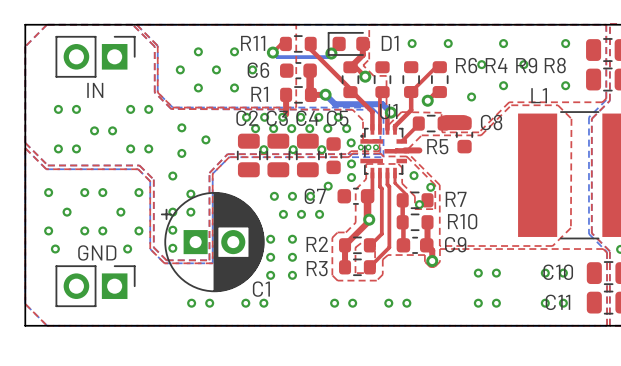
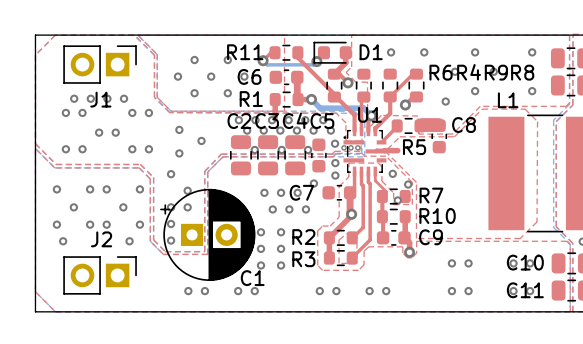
IN name: IN (95, 90) -> J1 (100, 99)
via: none -> (74, 98)
via: none -> (90, 98)
via: none -> (107, 98)
via: none -> (124, 98)
GND name: GND (97, 252) -> J2 (101, 239)

